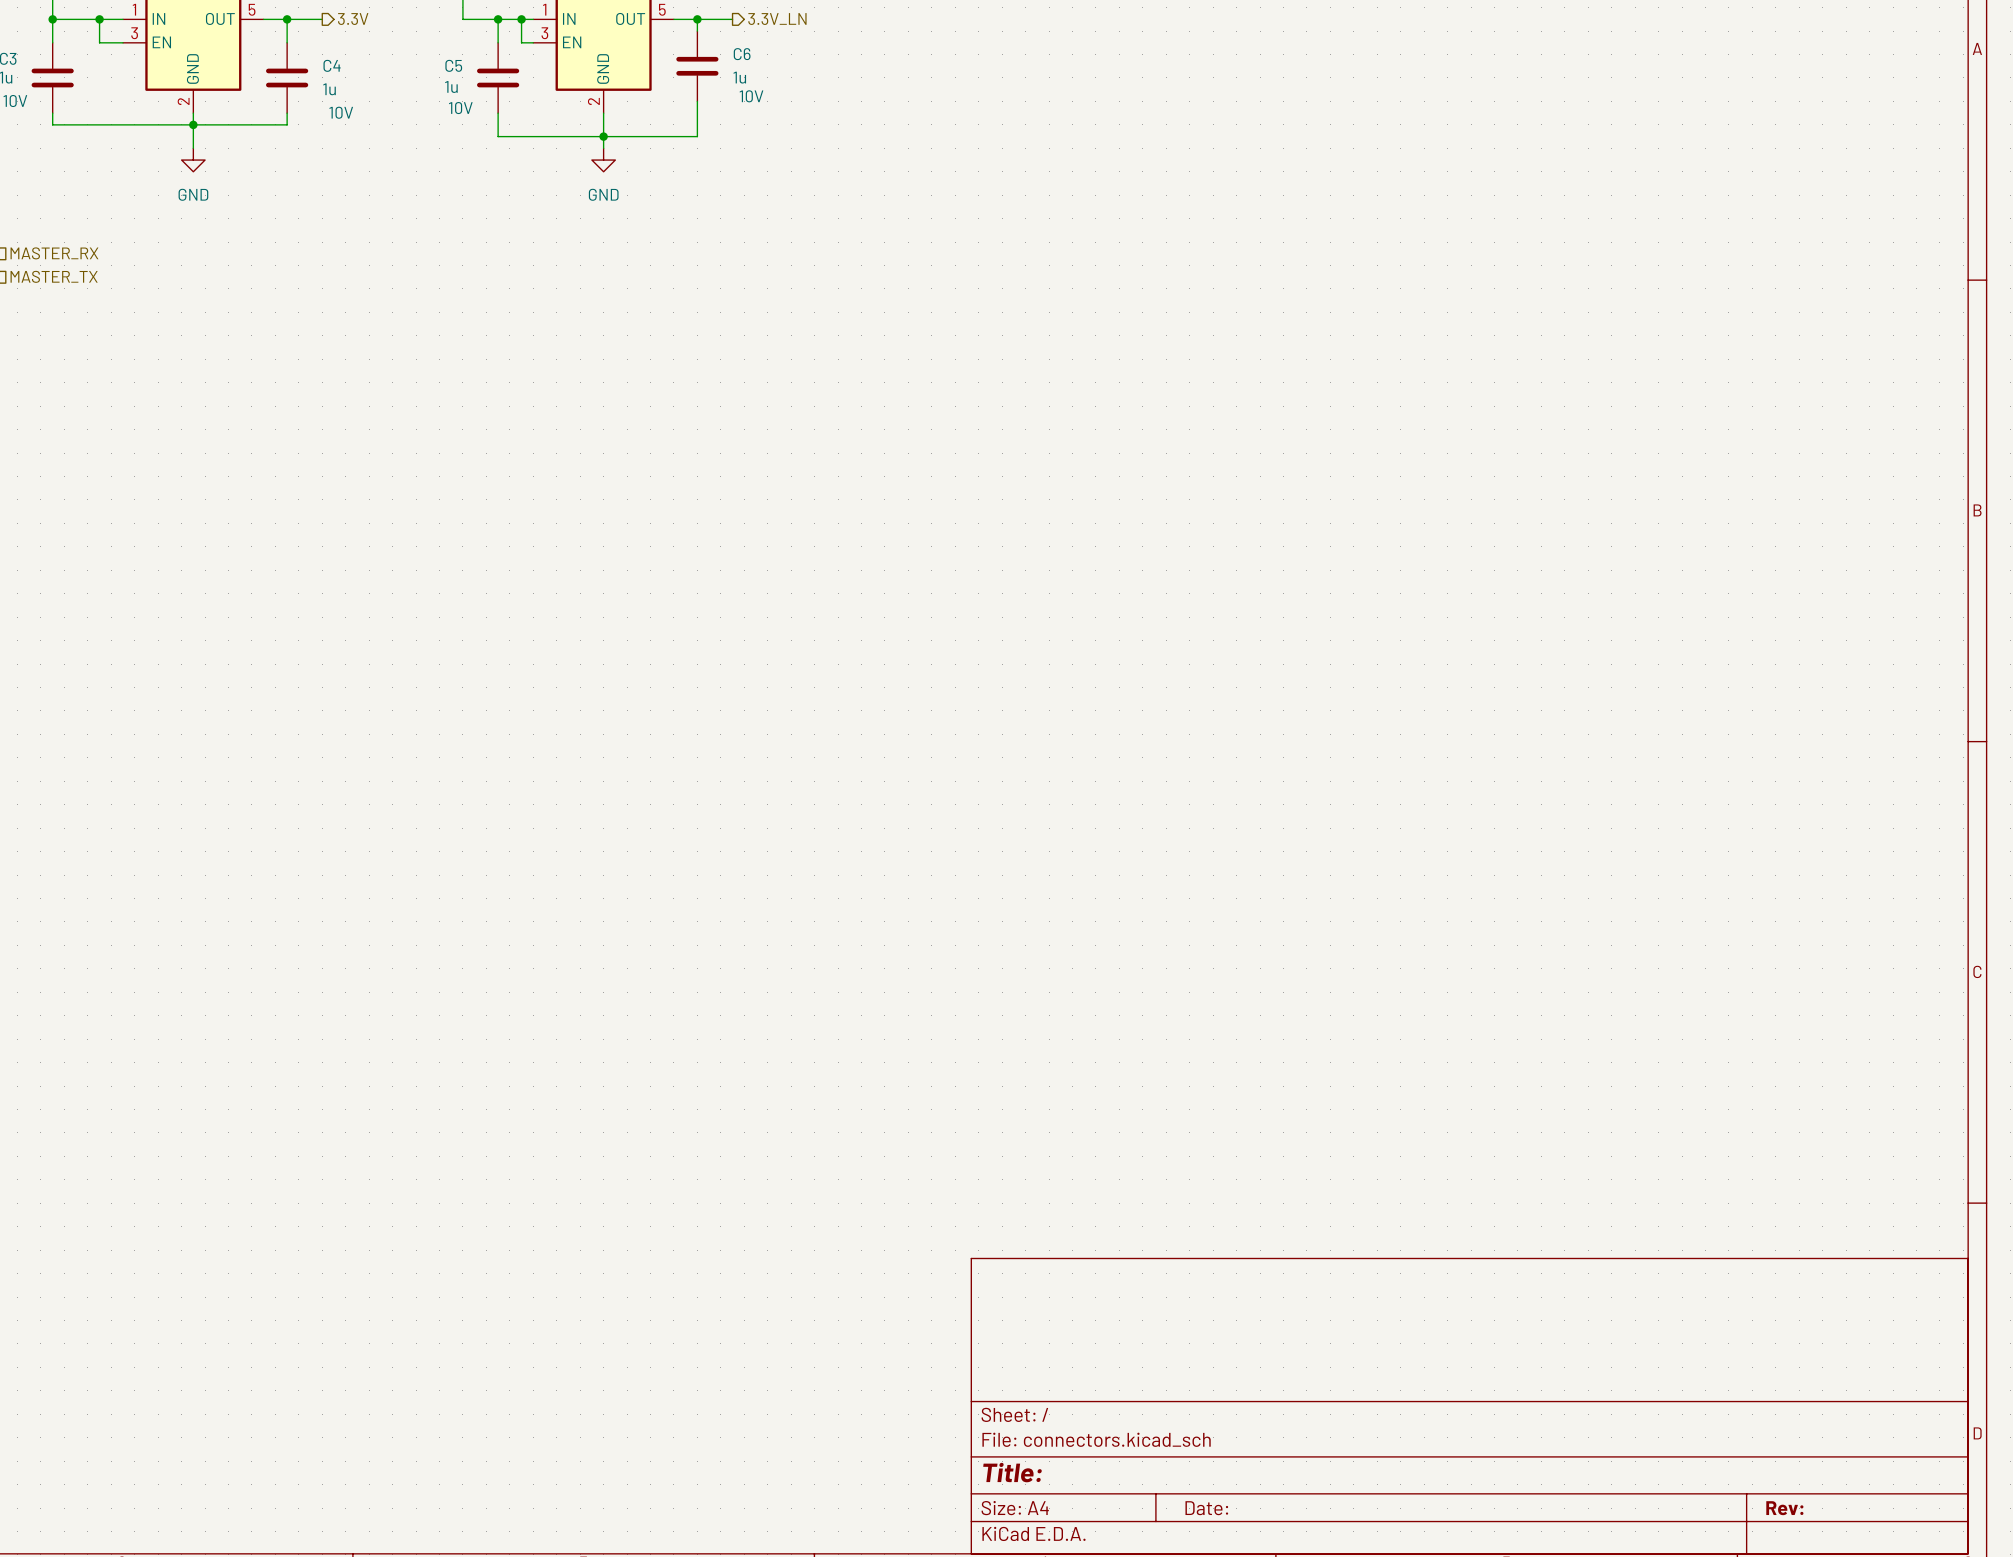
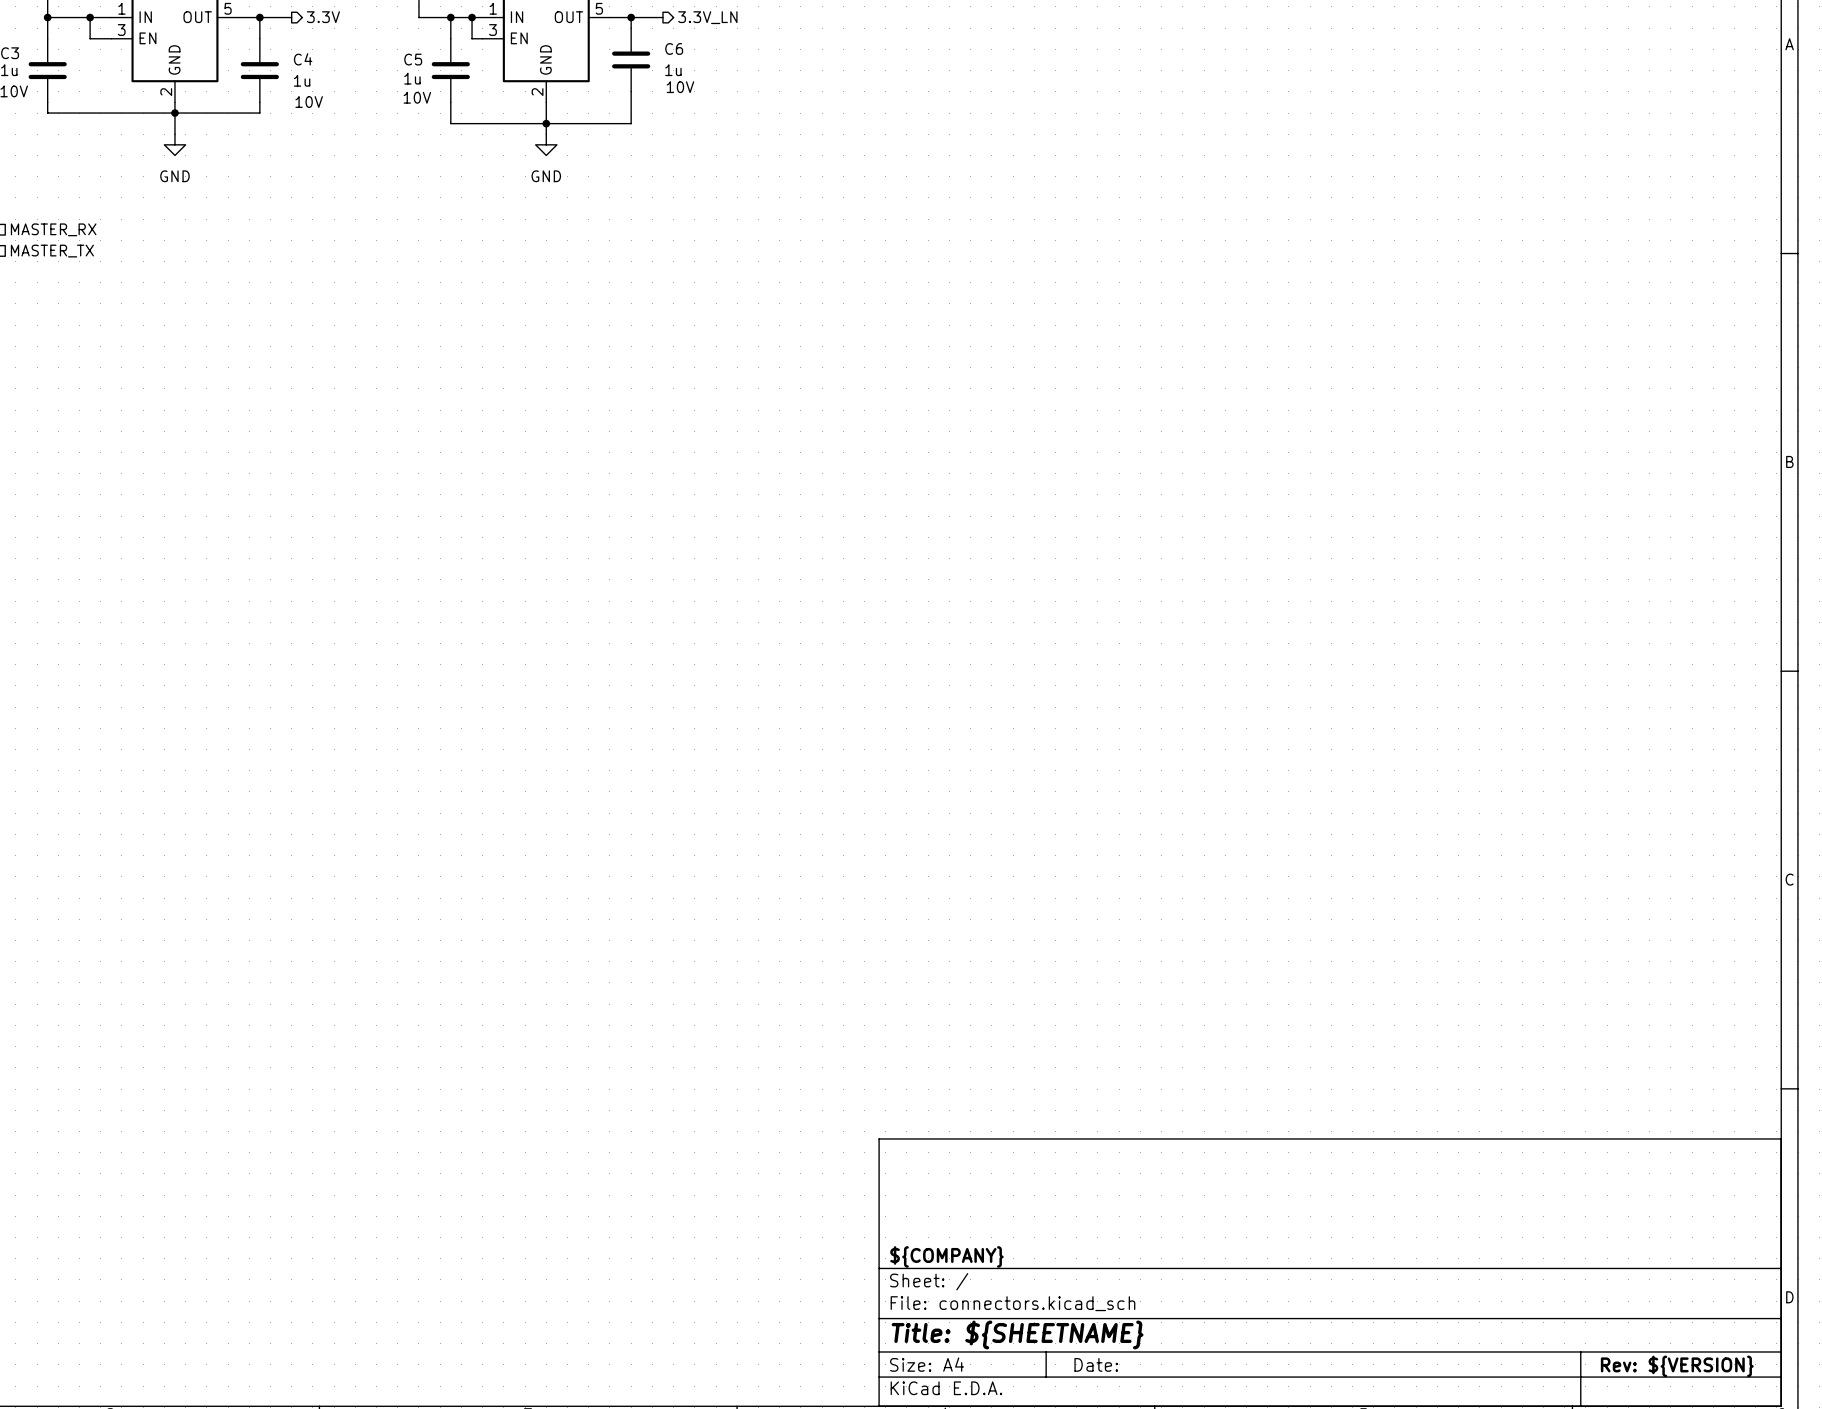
title block: none -> ${COMPANY} (946, 1256)
title block: Title: (1012, 1472) -> Title: ${SHEETNAME} (1017, 1334)
title block: Rev: (1784, 1508) -> Rev: ${VERSION} (1677, 1366)

